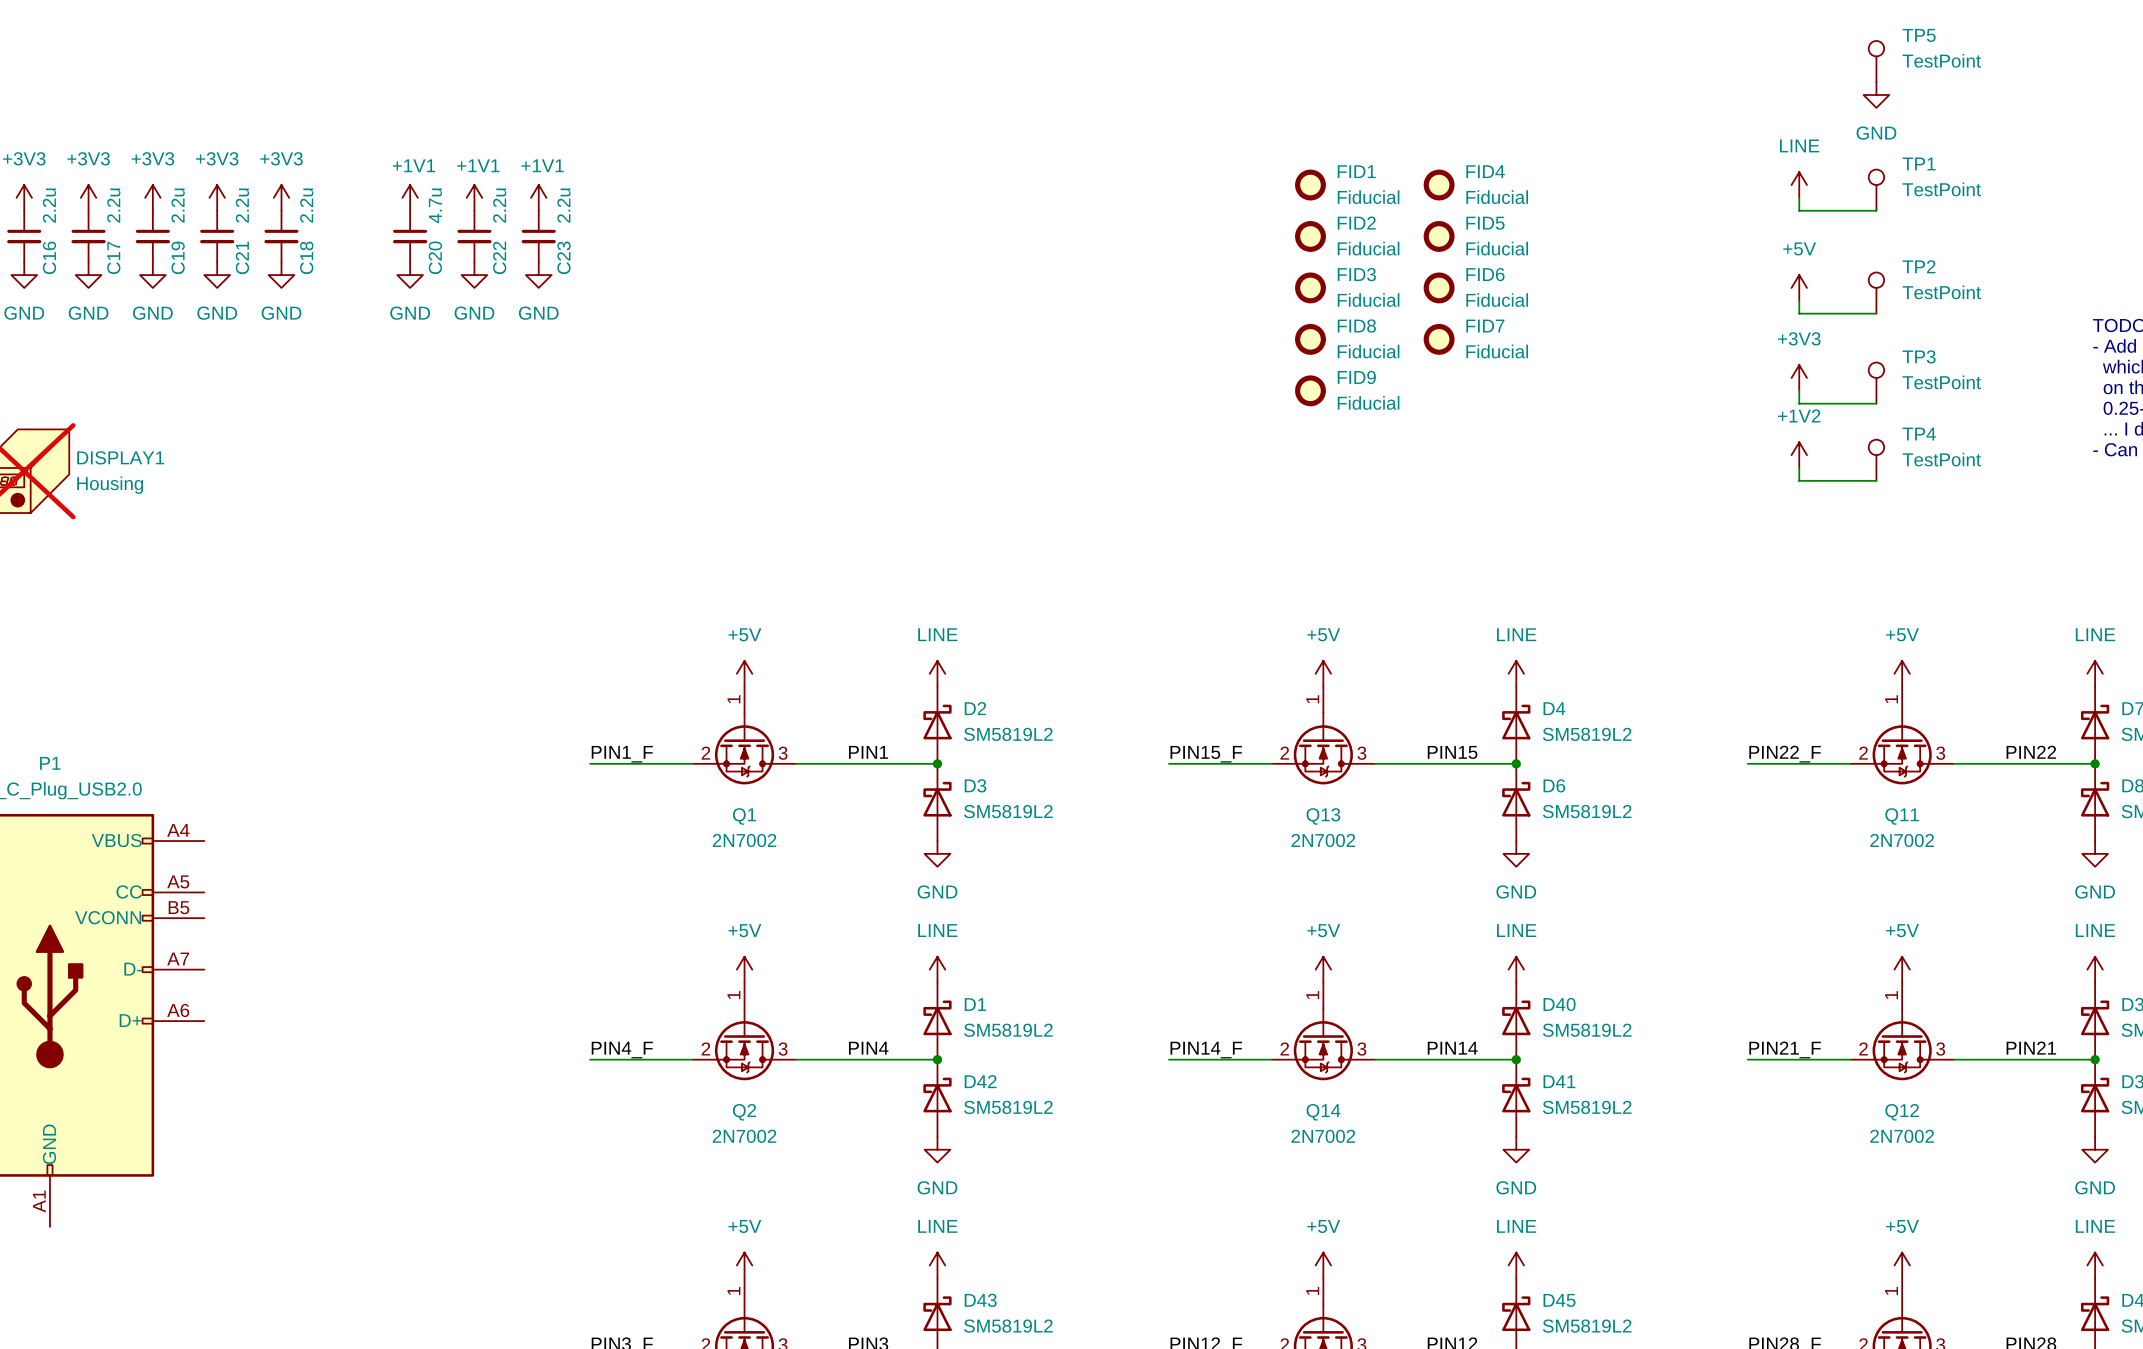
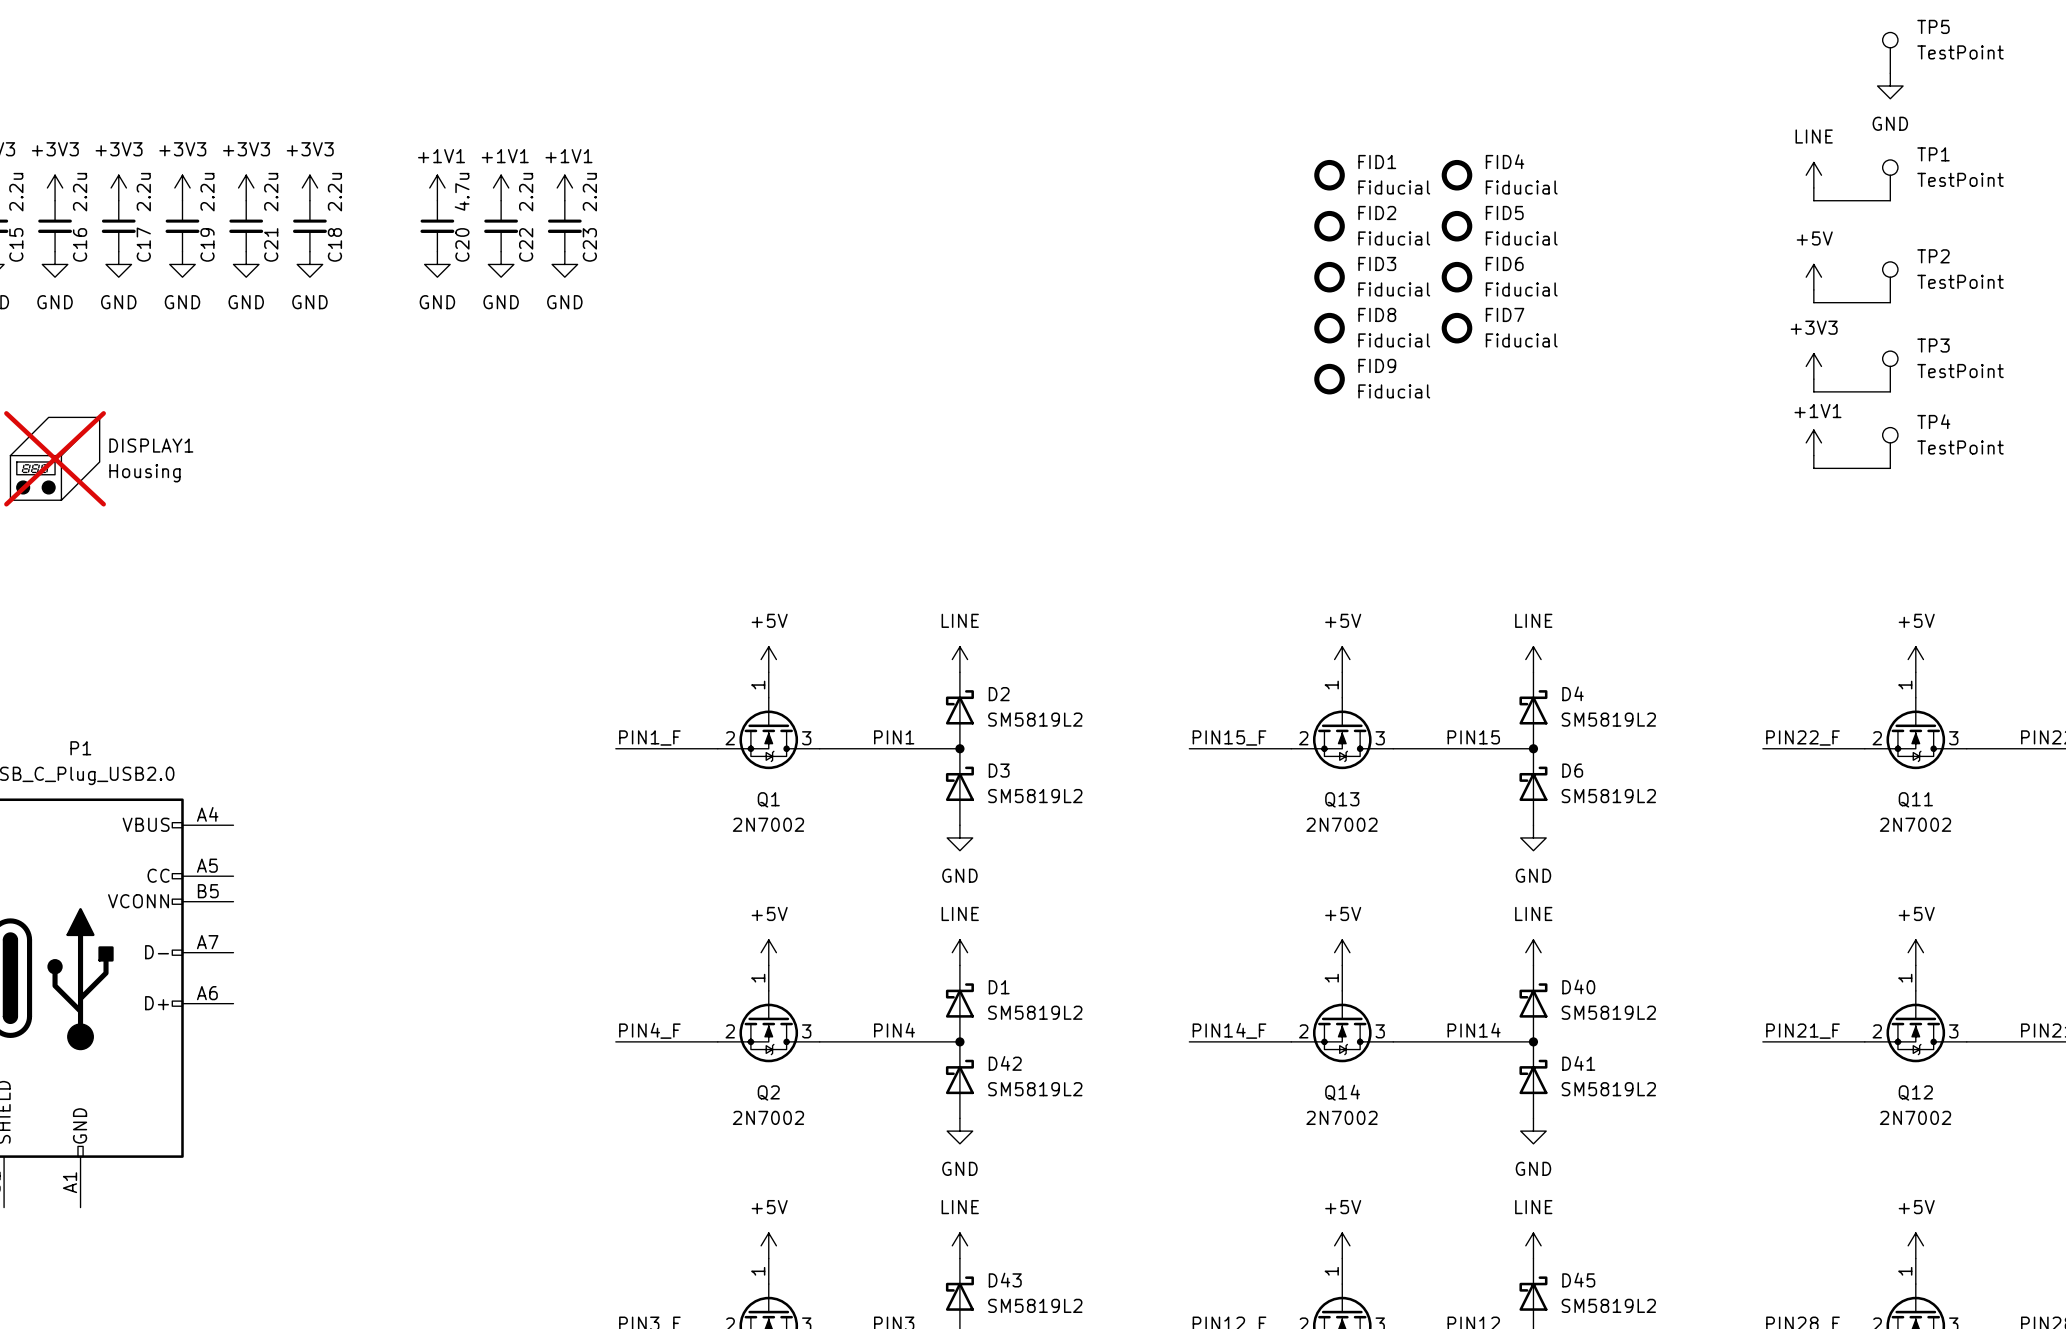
power symbol: +1V2 (1799, 455) -> +1V1 (1813, 442)

